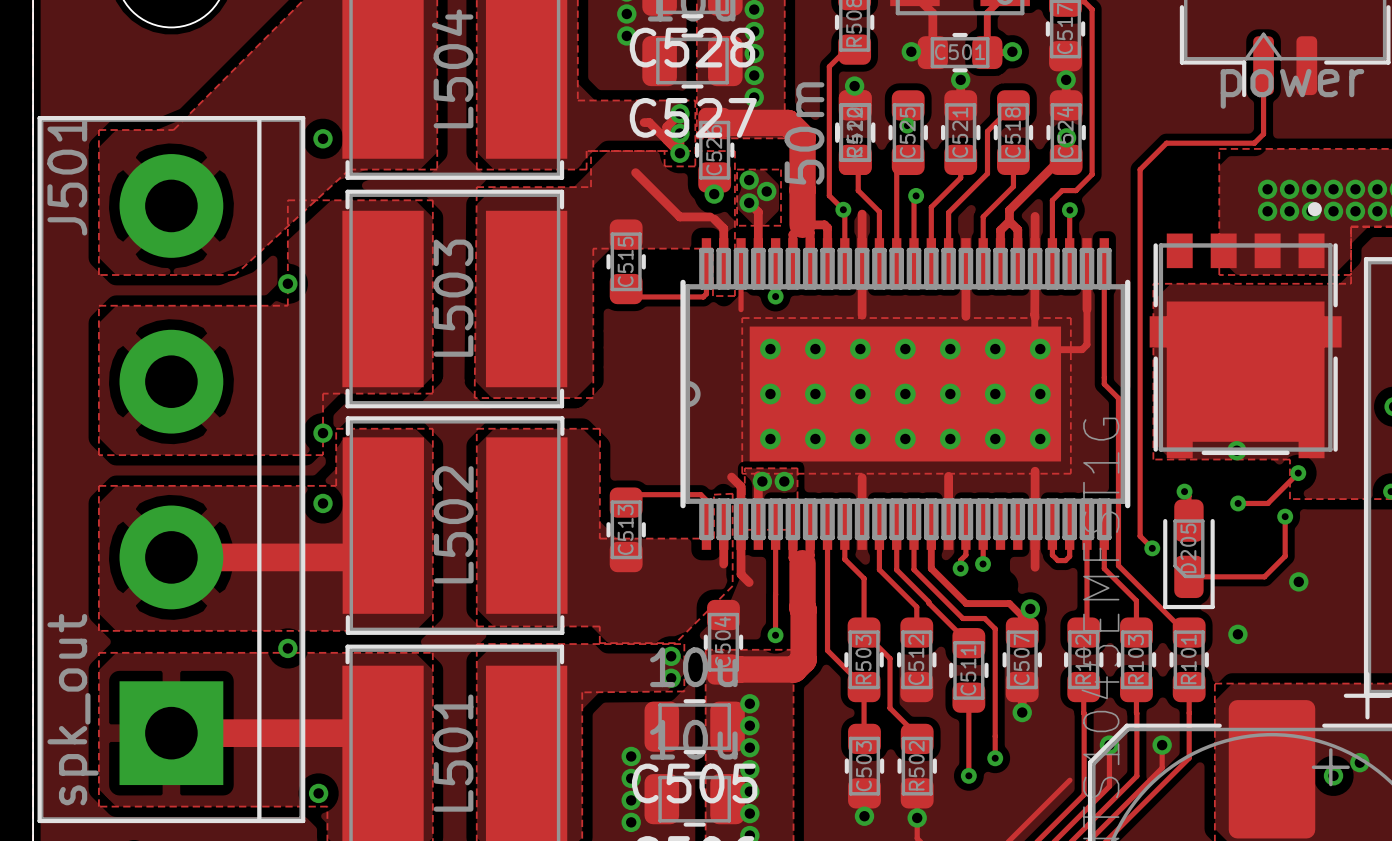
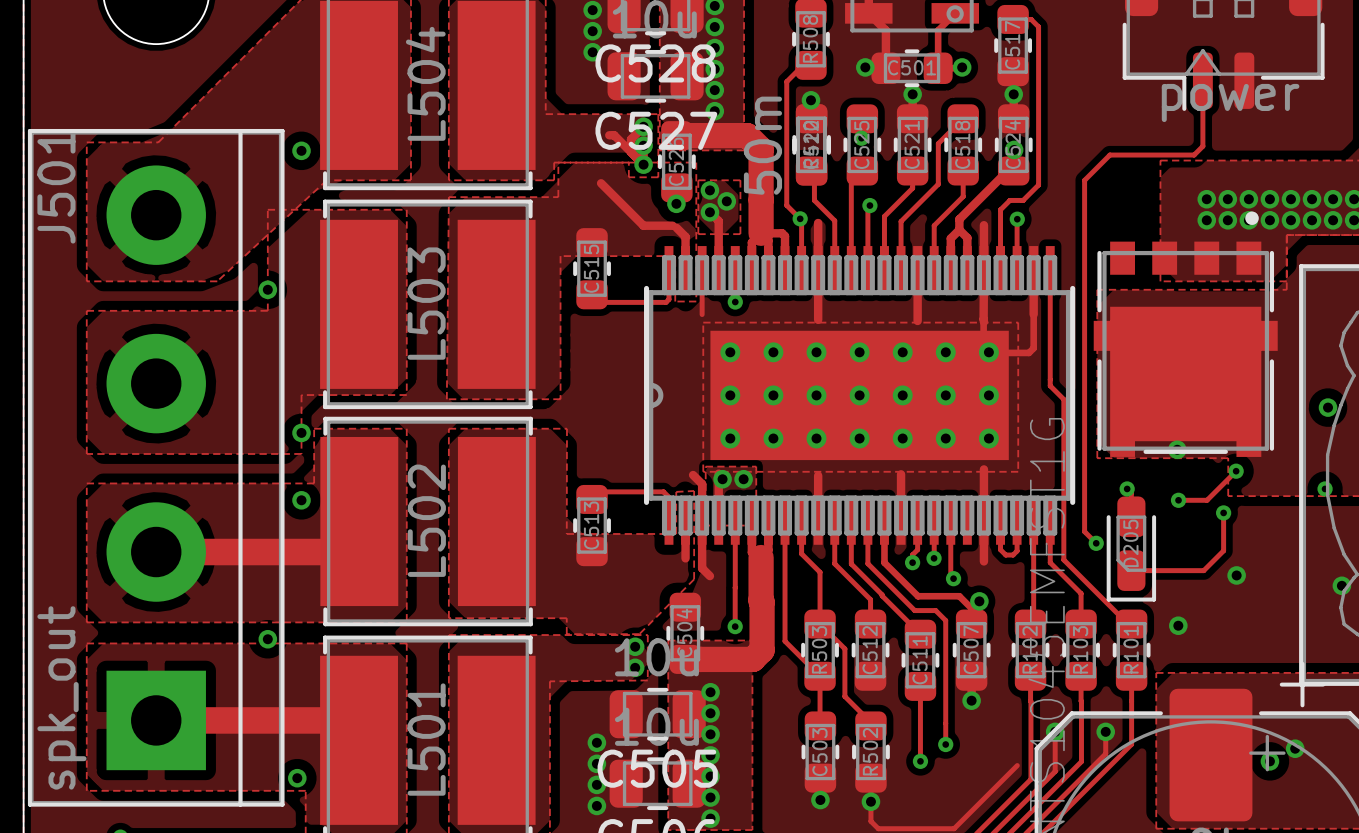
track: none -> (950, 520) (950, 575) (953, 578)
via: none -> (953, 578)

